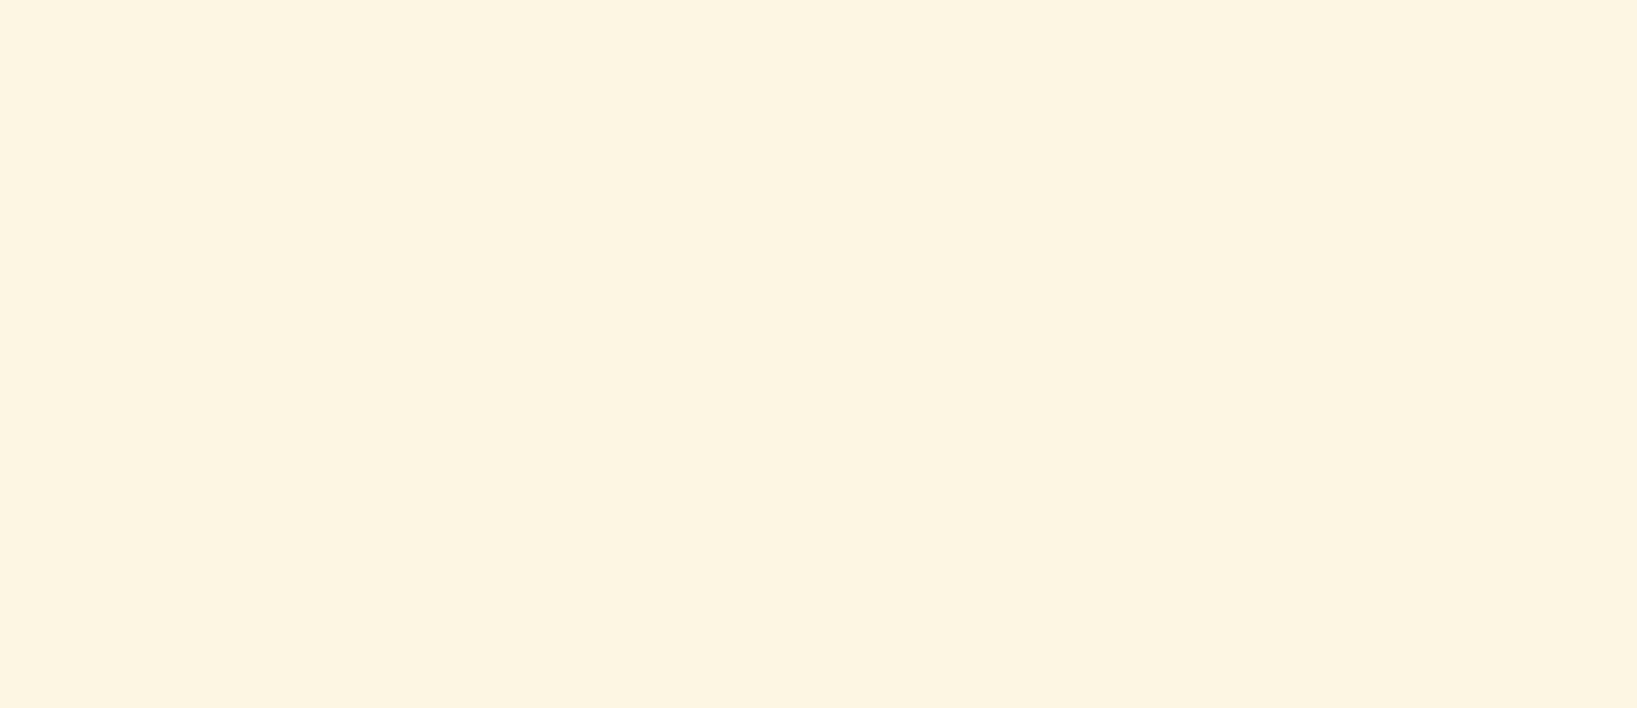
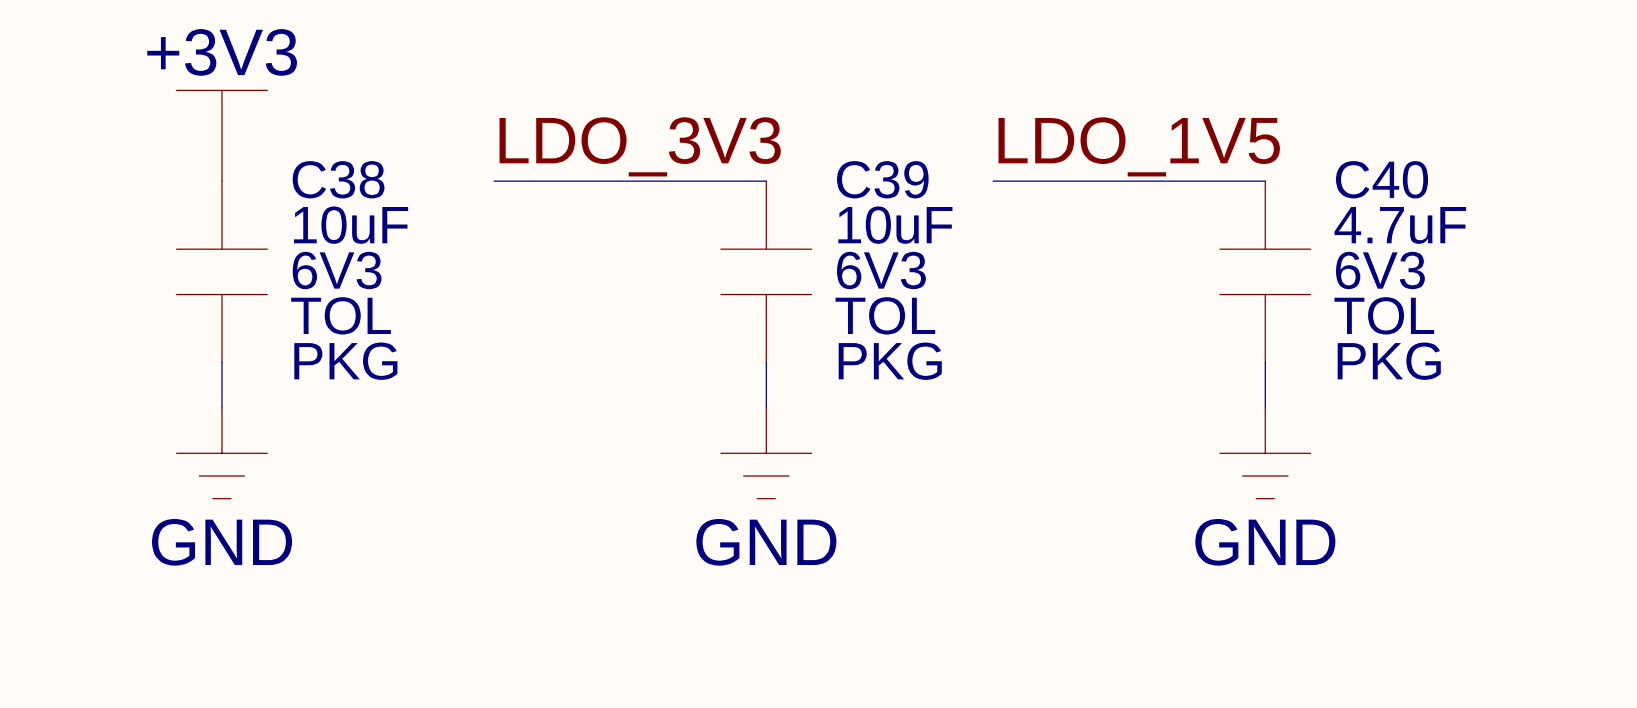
power symbol: none -> +3V3 (221, 135)
label: none -> LDO_3V3 (640, 146)
label: none -> LDO_1V5 (1139, 146)
wire: none -> (494, 181) (766, 181)
wire: none -> (993, 181) (1265, 181)
C38: none -> 10uF (221, 271)
C39: none -> 10uF (766, 271)
C40: none -> 4.7uF (1265, 271)
wire: none -> (221, 362) (221, 407)
wire: none -> (766, 362) (766, 407)
wire: none -> (1265, 362) (1265, 407)
power symbol: none -> GND (221, 453)
power symbol: none -> GND (766, 453)
power symbol: none -> GND (1265, 453)

